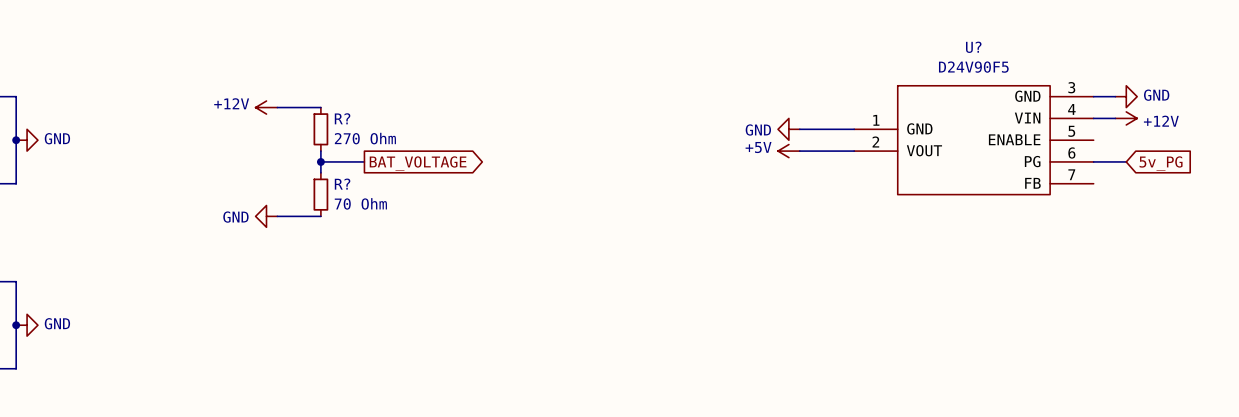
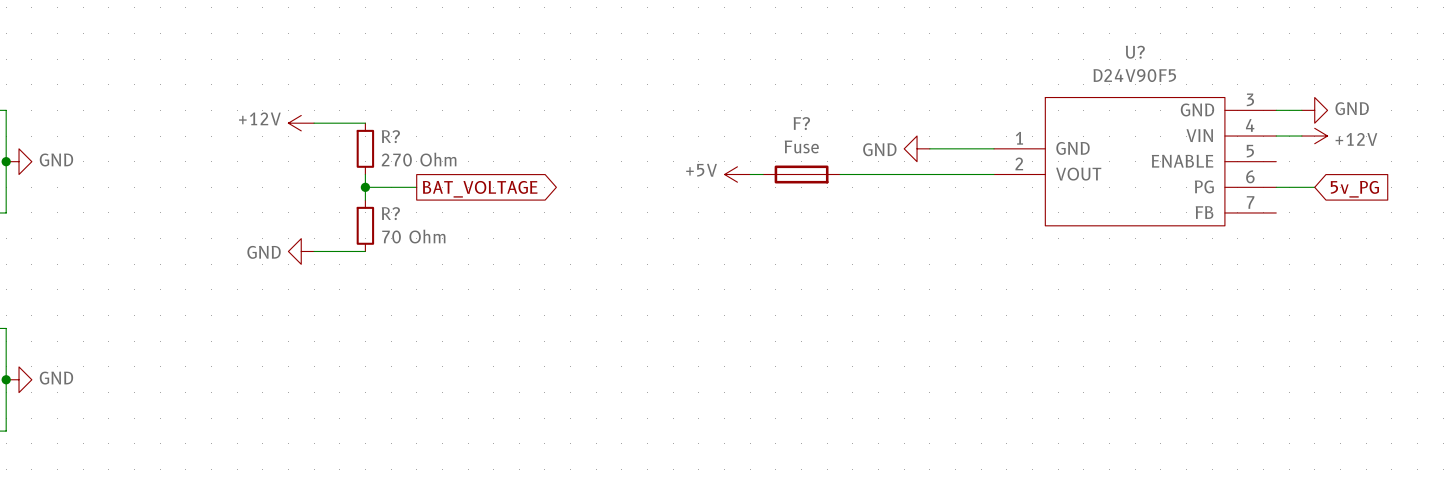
wire: none -> (750, 174) (763, 174)
F?: none -> Fuse (801, 174)
wire: none -> (840, 174) (929, 174)
power symbol position: +5V (788, 151) -> +5V (737, 174)

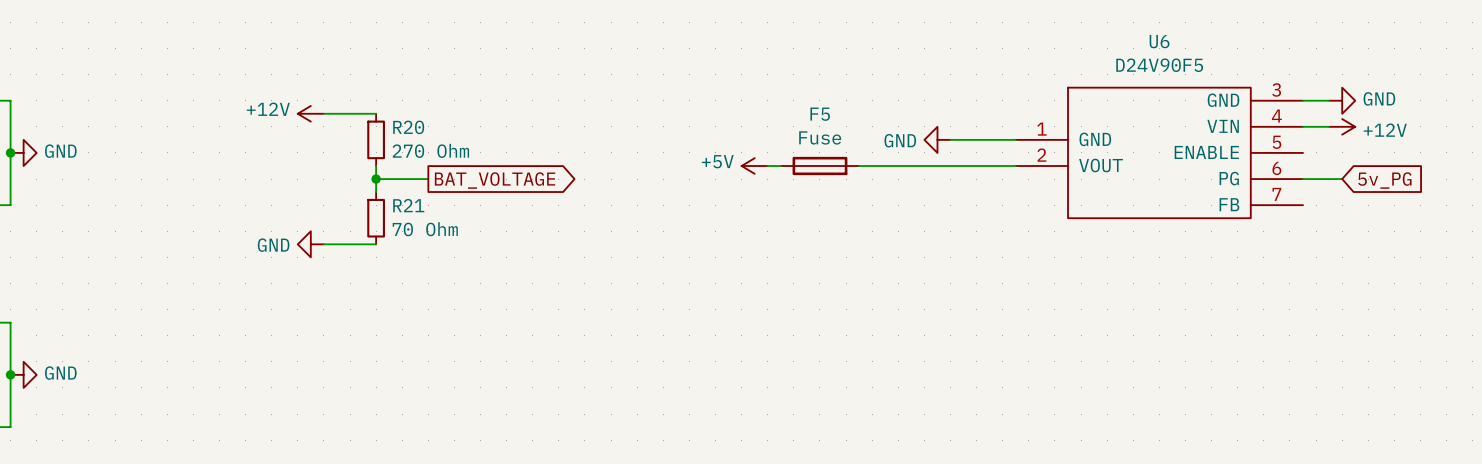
U? name: U? (1135, 52) -> U6 (1159, 41)
F? name: F? (801, 123) -> F5 (820, 114)
R? name: R? (390, 136) -> R20 (408, 127)
R? name: R? (390, 213) -> R21 (408, 205)

